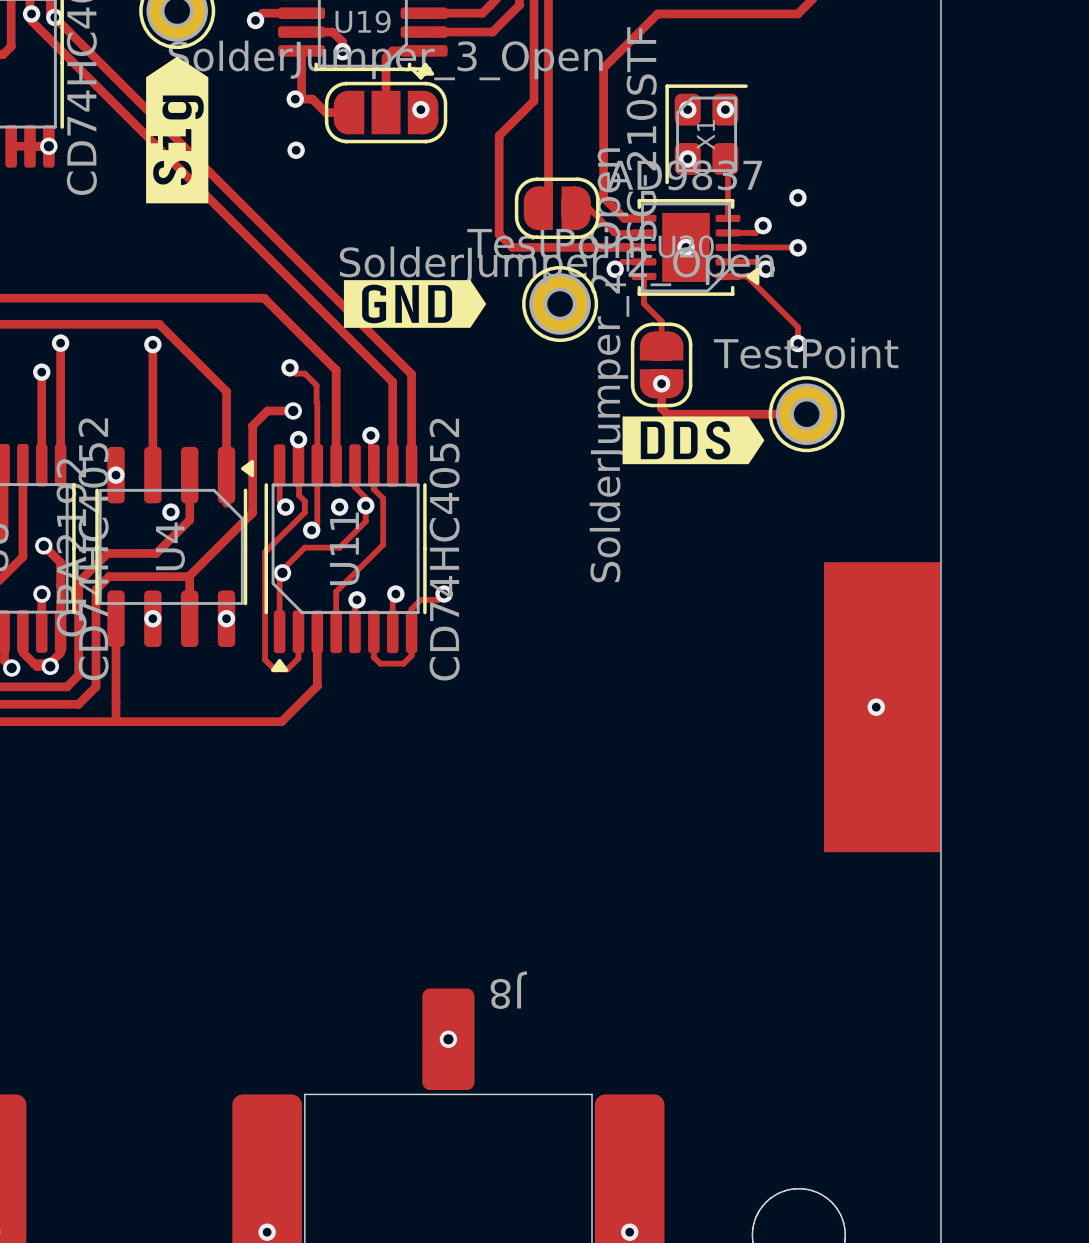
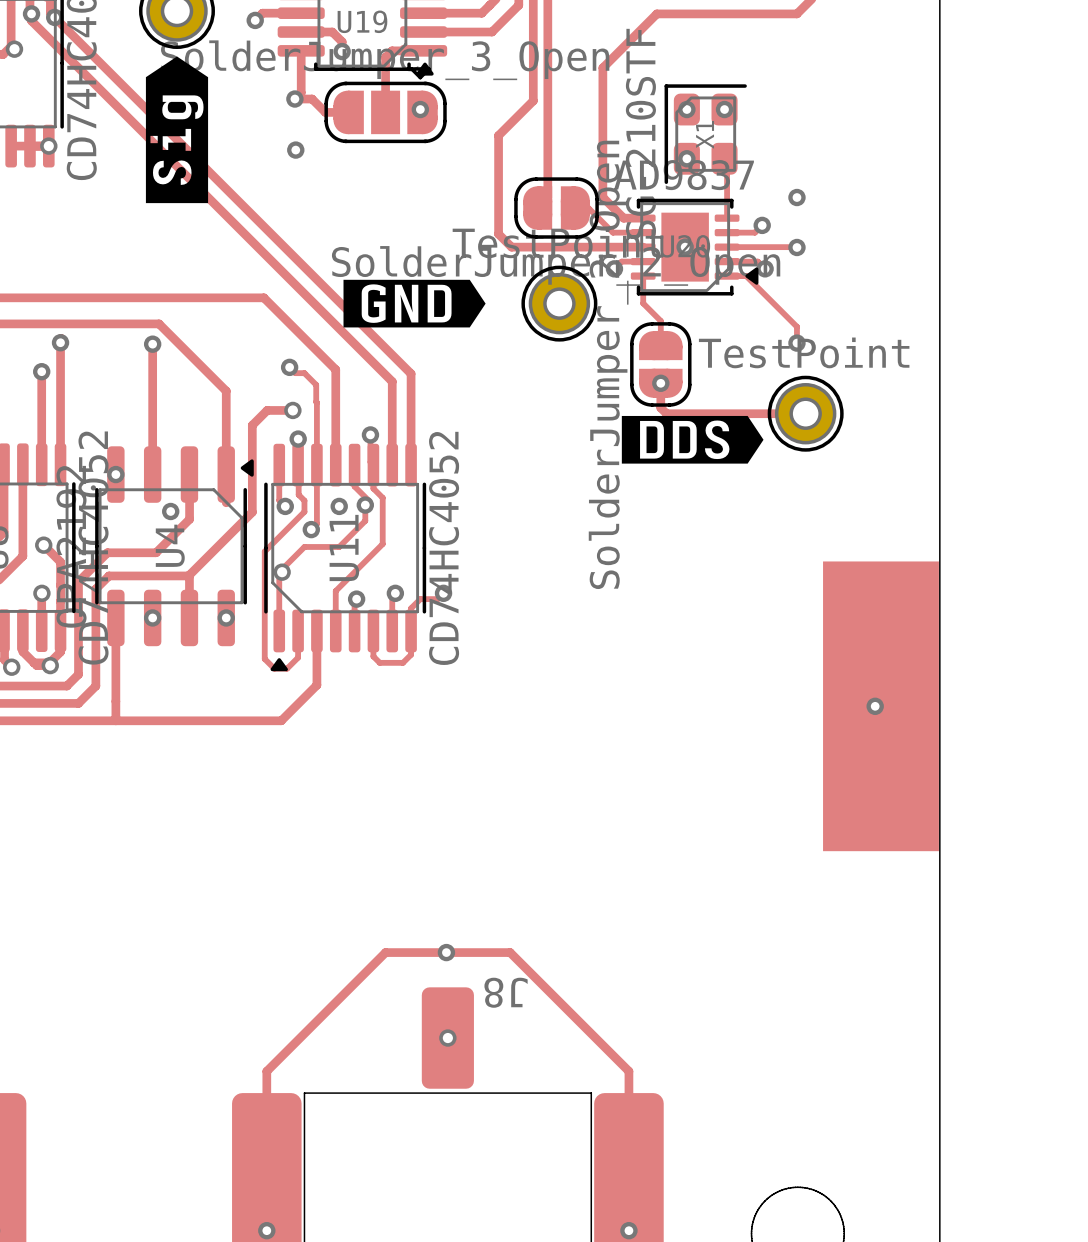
via: none -> (14, 49)
via: none -> (446, 952)
track: none -> (266, 1230) (266, 1071) (385, 952) (510, 952) (628, 1071) (628, 1230)

